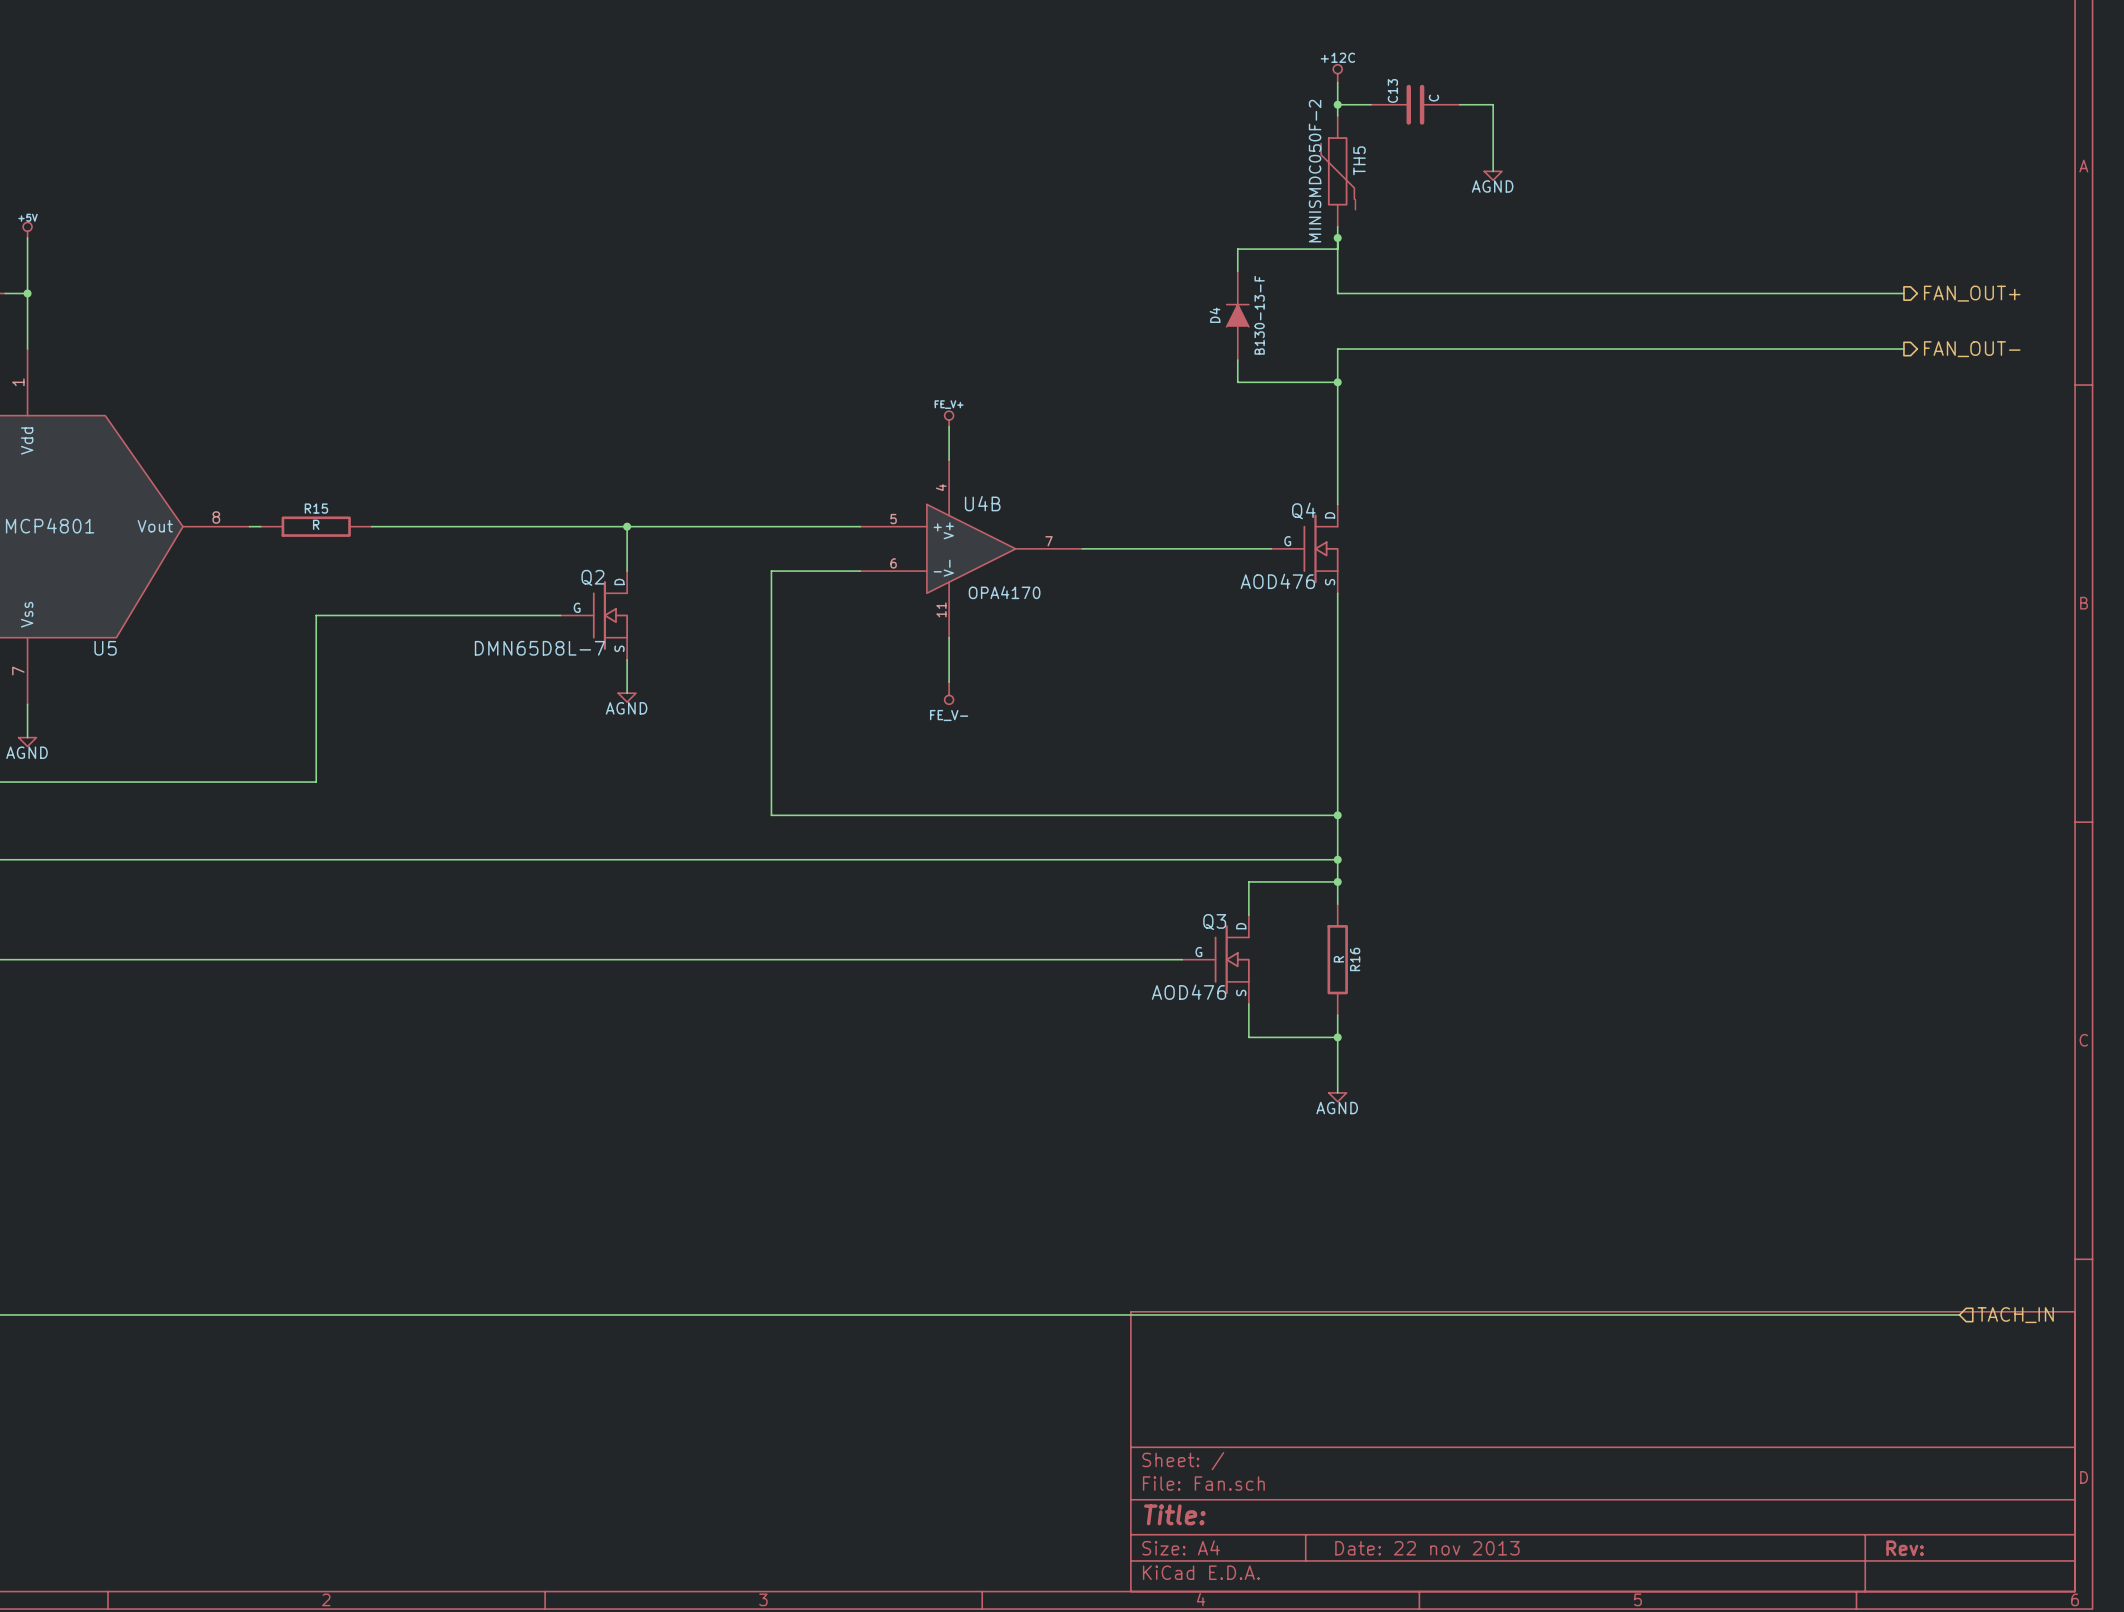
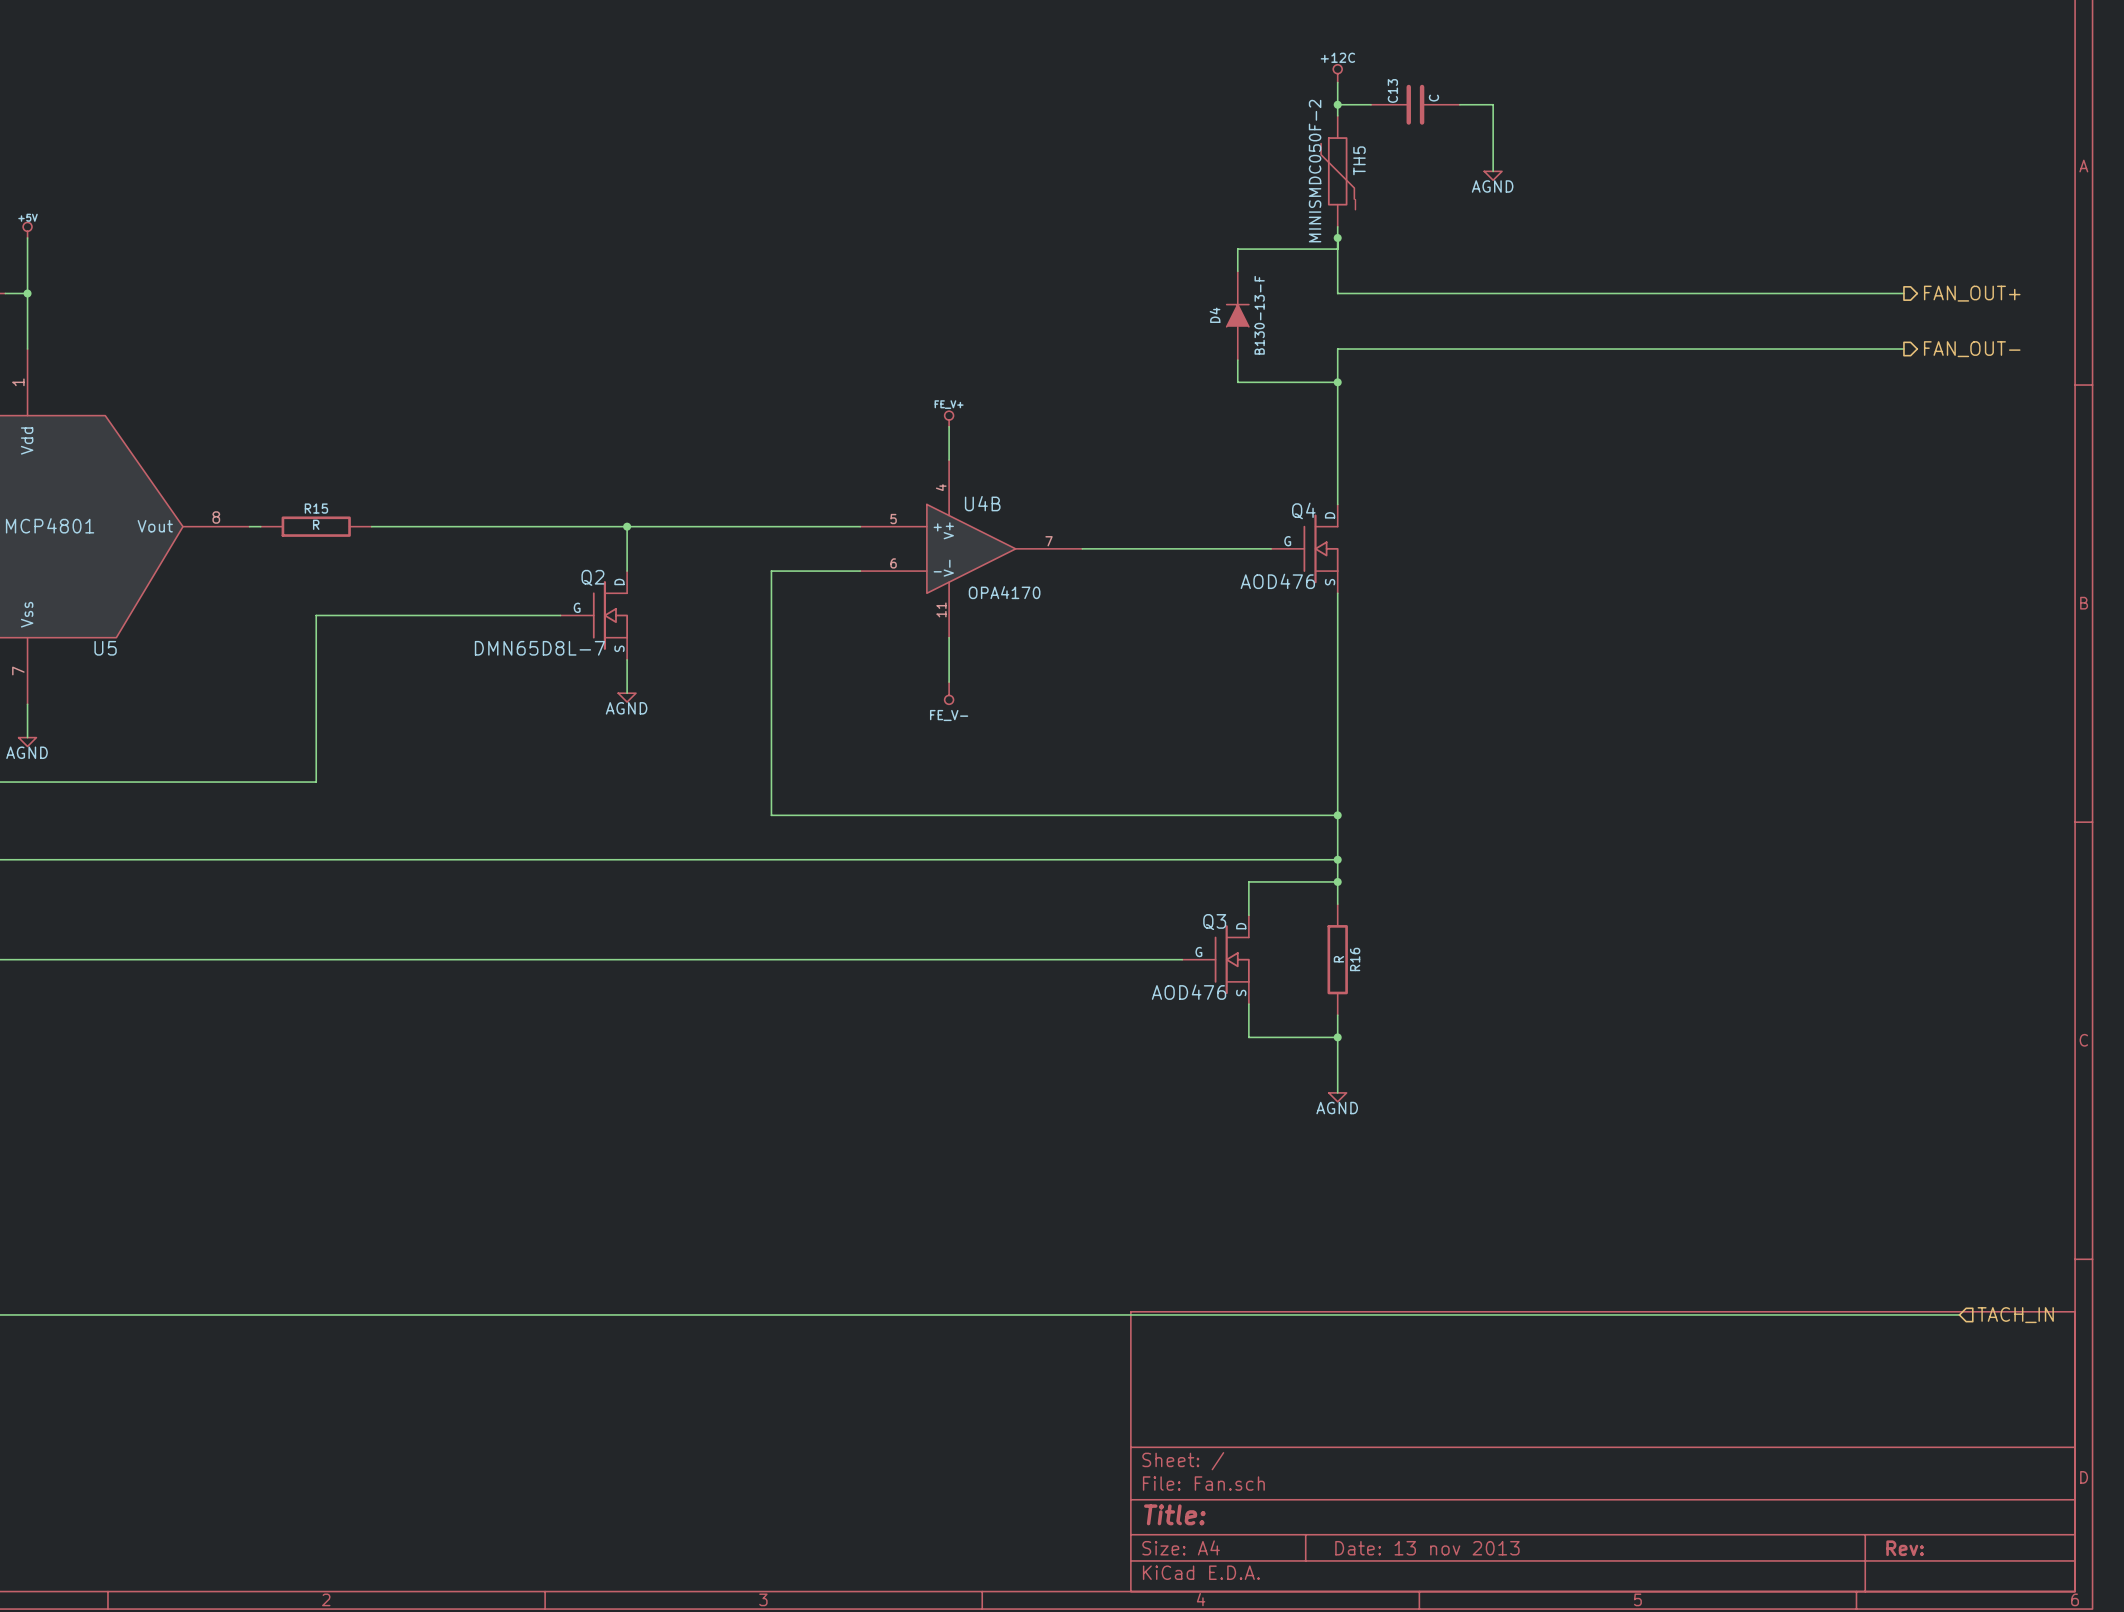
title block: Date: 22 nov 2013 (1427, 1548) -> Date: 13 nov 2013 (1427, 1548)

